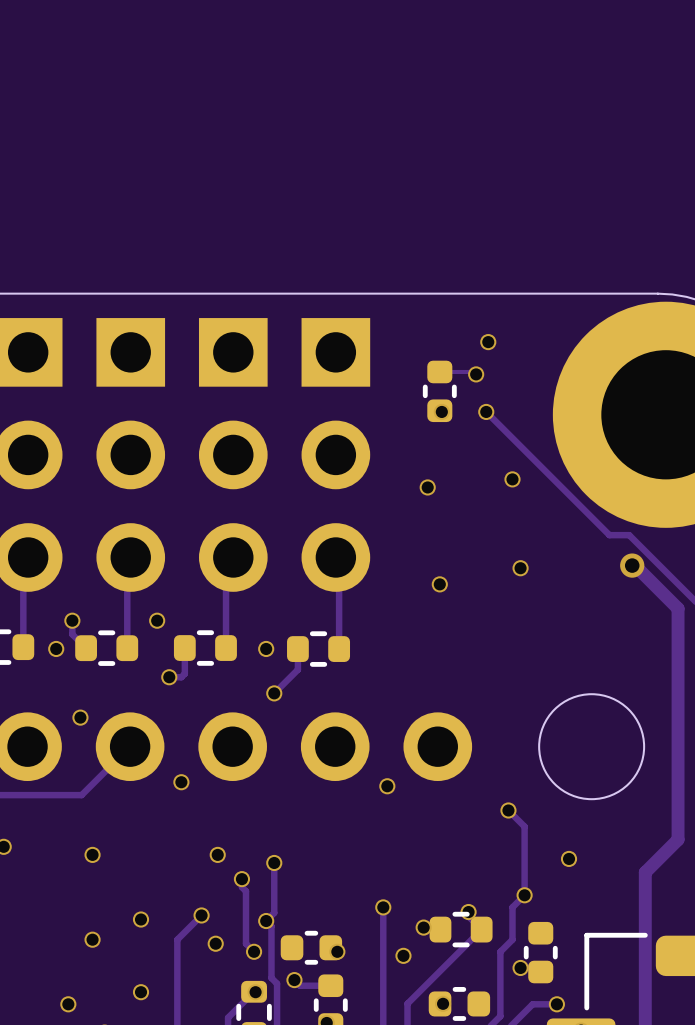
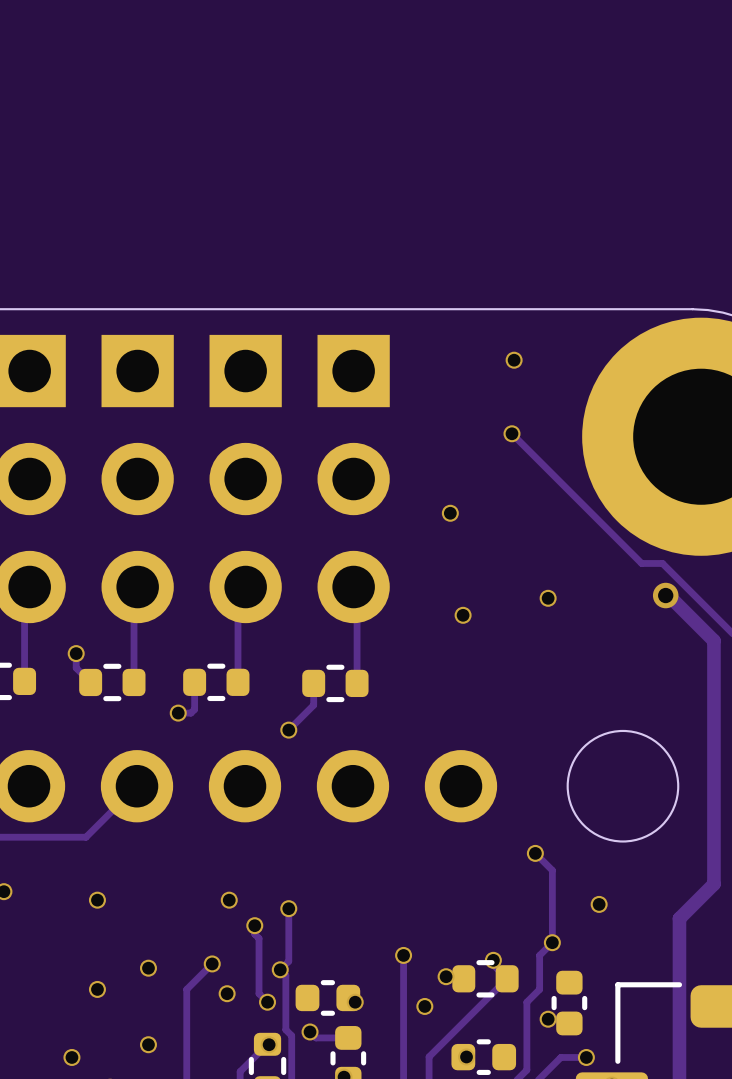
track: (439, 371) (473, 371) (476, 374) -> none
via: (476, 374) -> none
part: (439, 391) -> none
via: (441, 411) -> none
via: (512, 479) -> none
via: (157, 620) -> none
via: (56, 648) -> none
via: (266, 648) -> none
via: (80, 717) -> none
via: (181, 782) -> none
via: (387, 786) -> none

